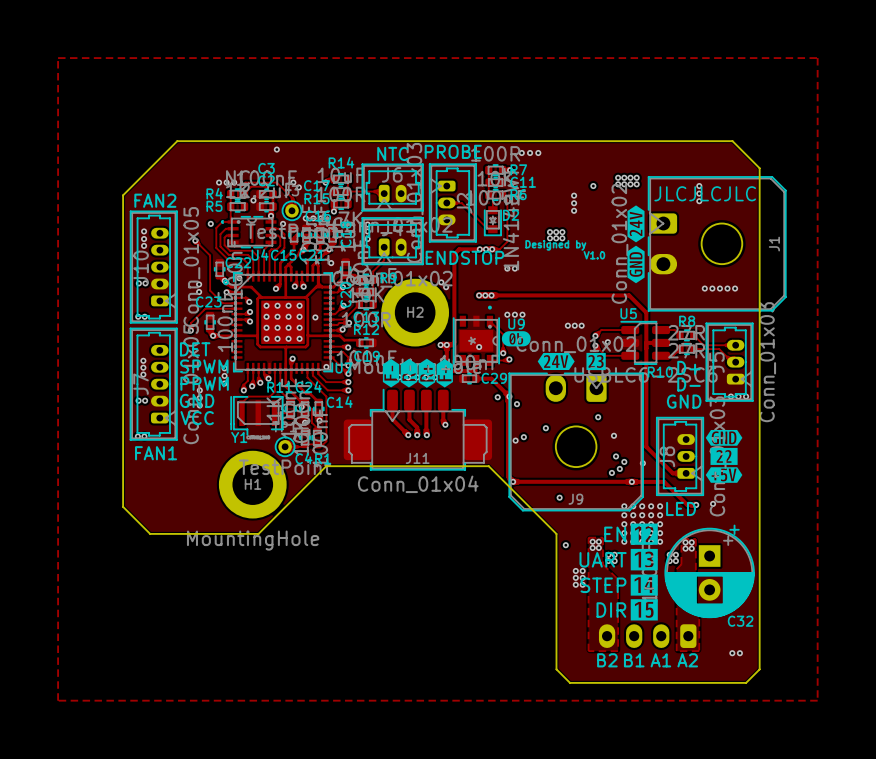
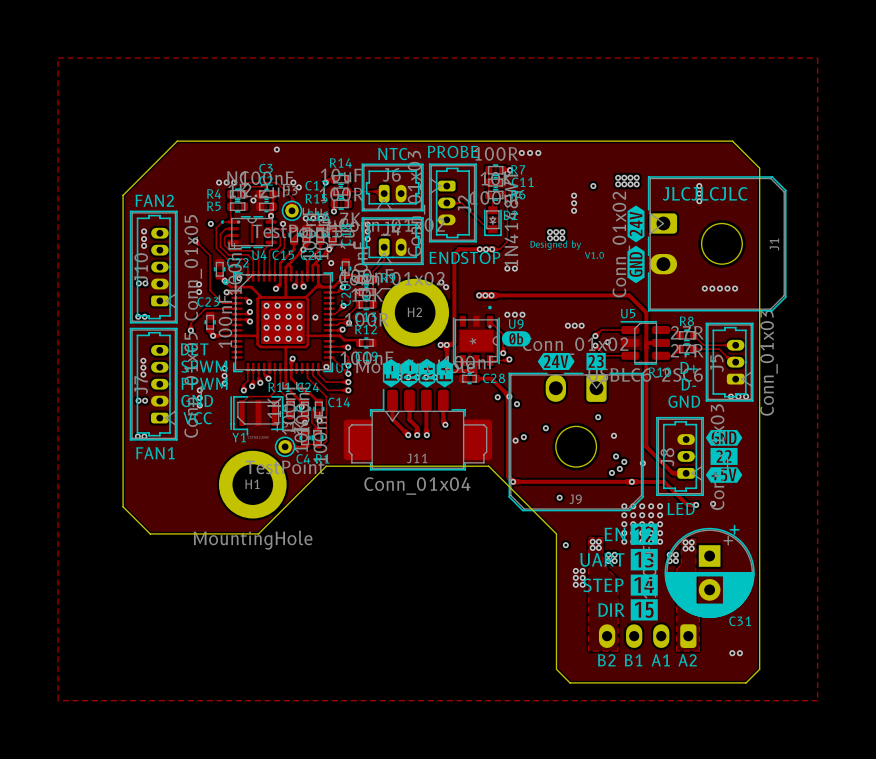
via: (479, 347) -> none
C29 name: C29 (494, 378) -> C28 (494, 378)
C32 name: C32 (740, 621) -> C31 (740, 621)

